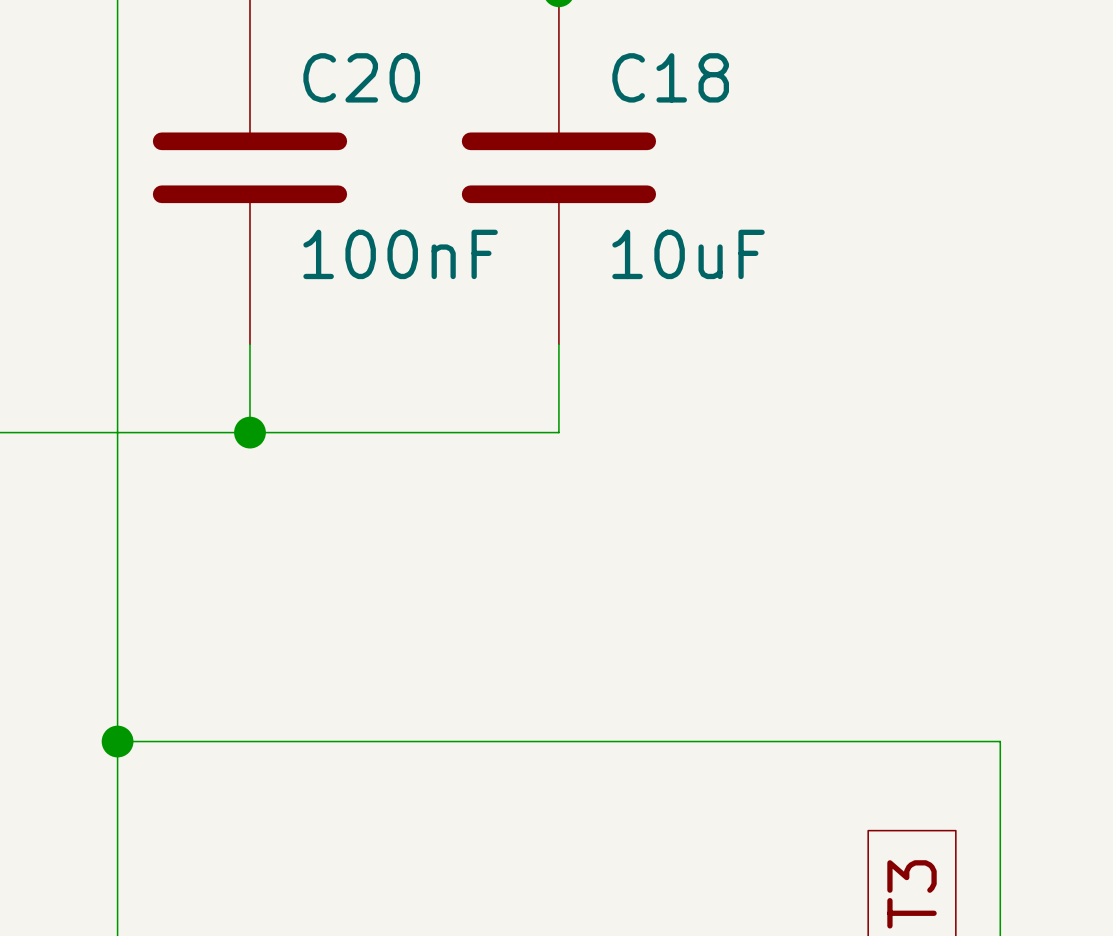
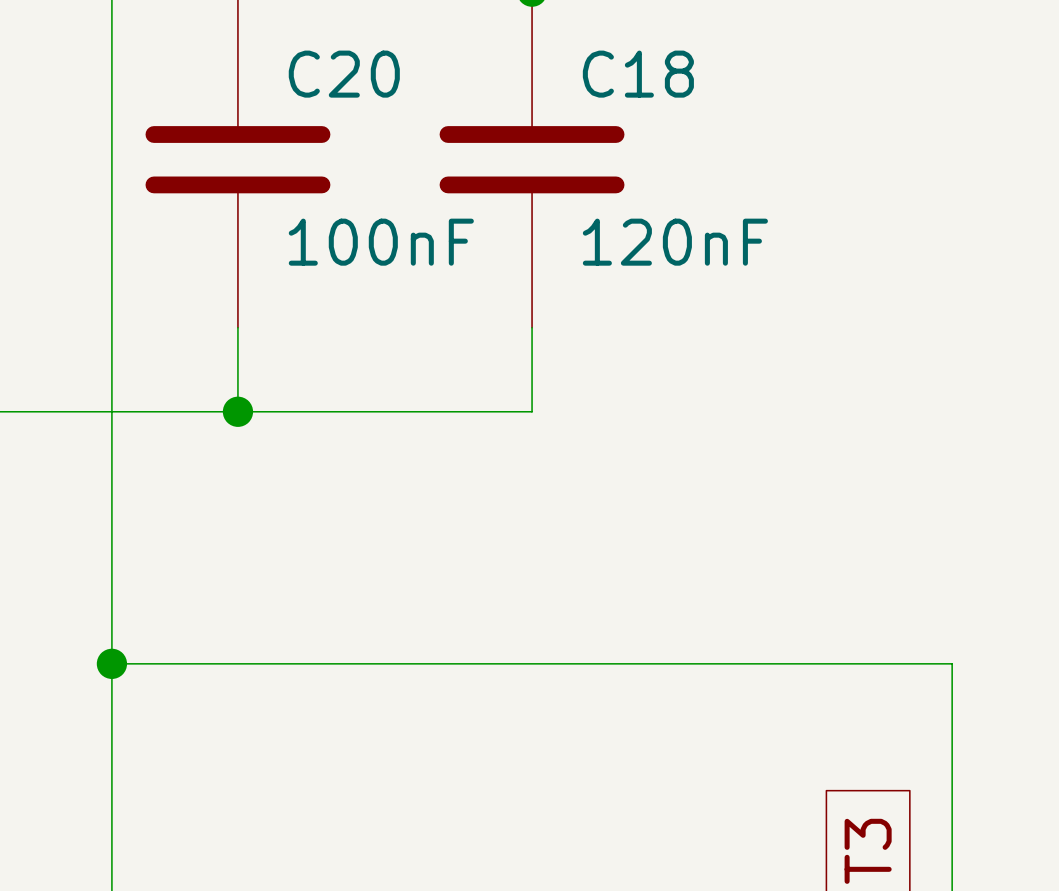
C18 value: 10uF (688, 254) -> 120nF (675, 242)
wire: (117, 741) (1000, 741) -> (111, 663) (952, 663) (952, 705)
junction position: (117, 741) -> (111, 663)

